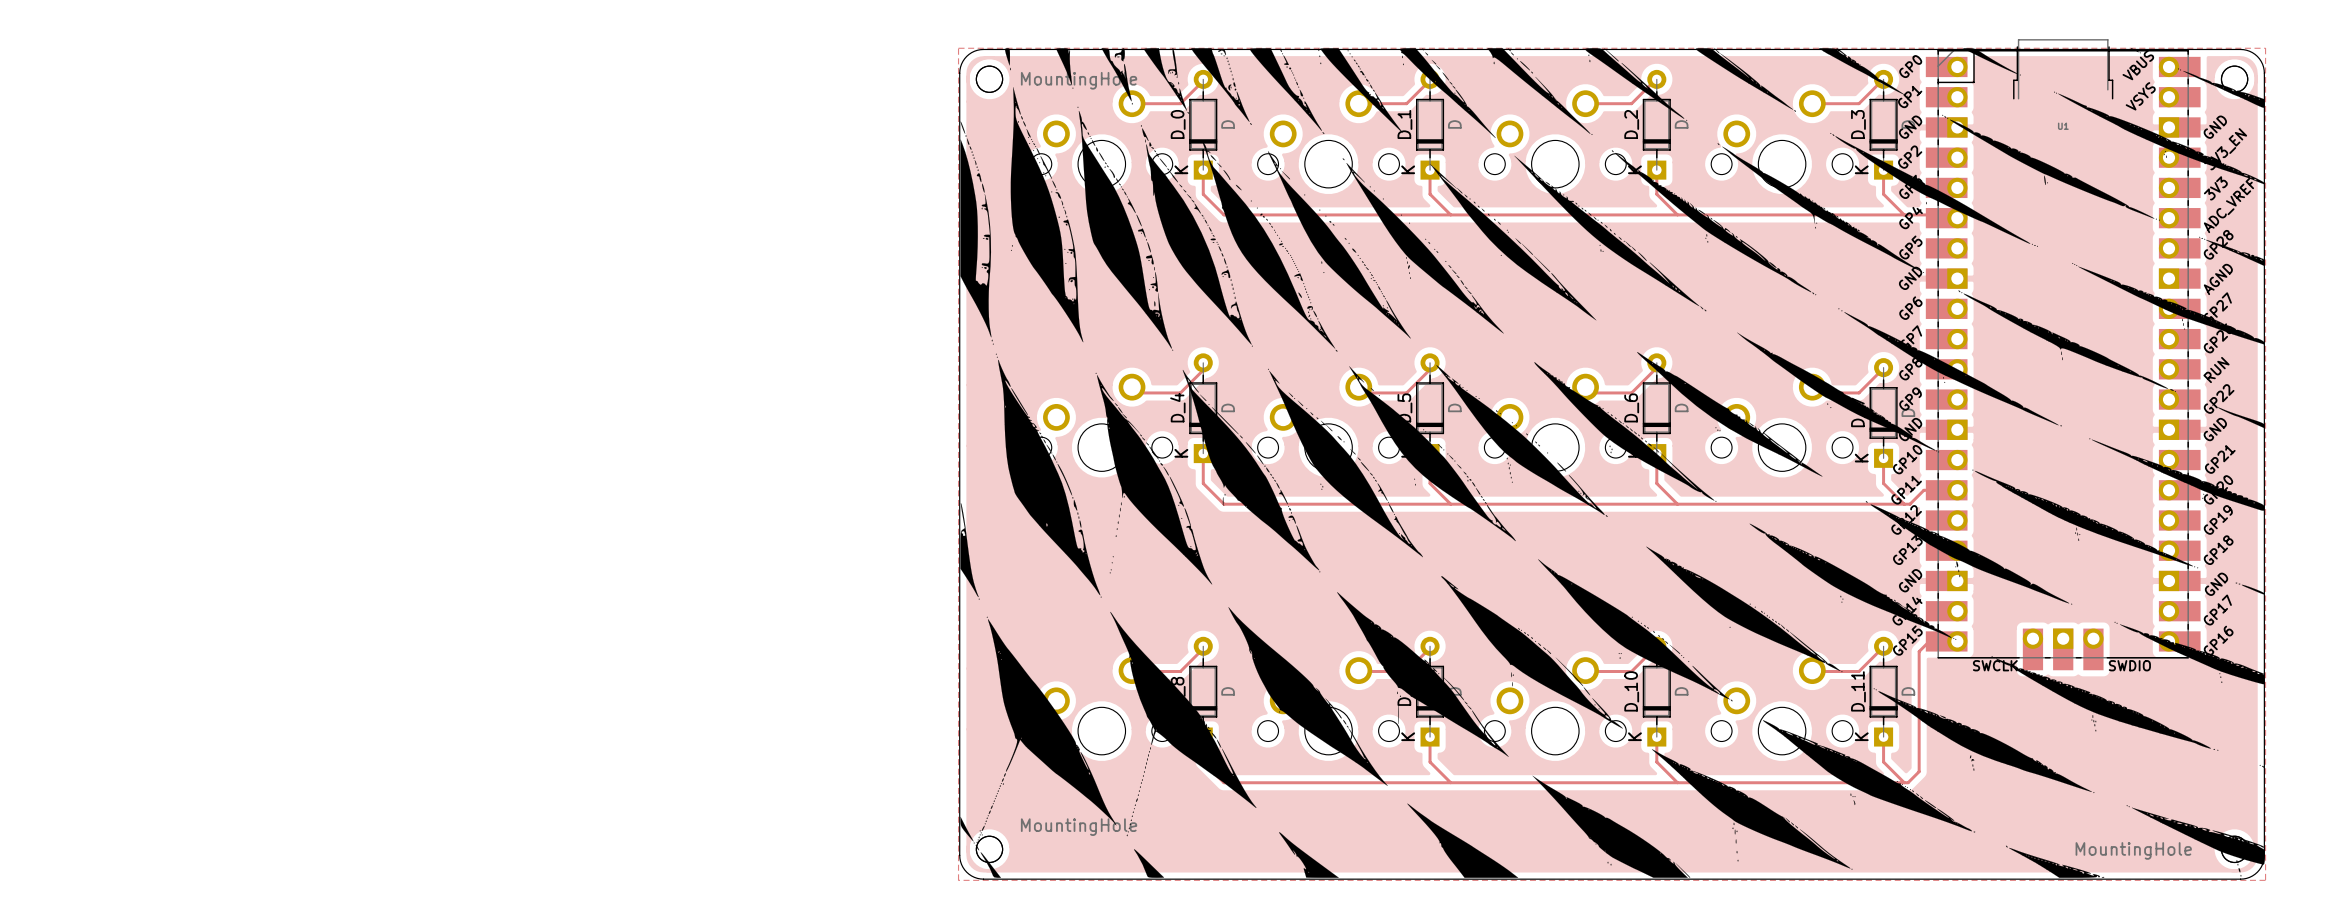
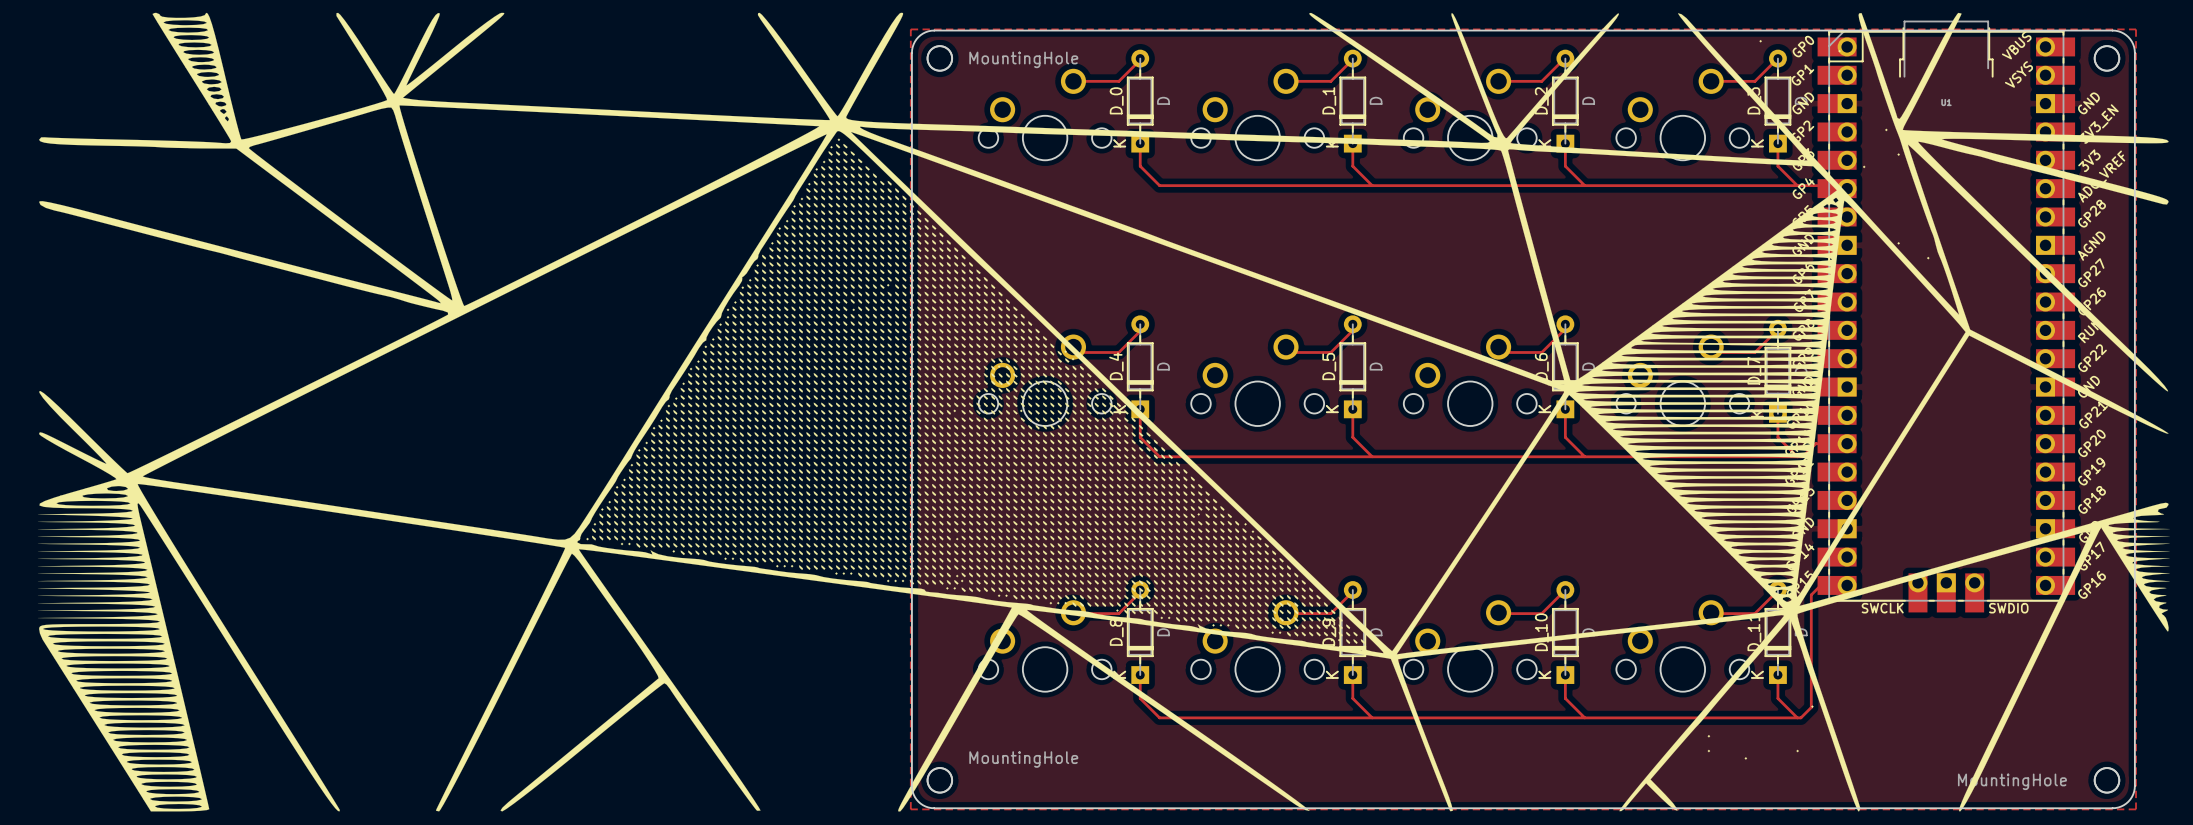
drawing: none -> [37, 12, 2170, 812]
drawing: [960, 47, 2265, 878] -> none

